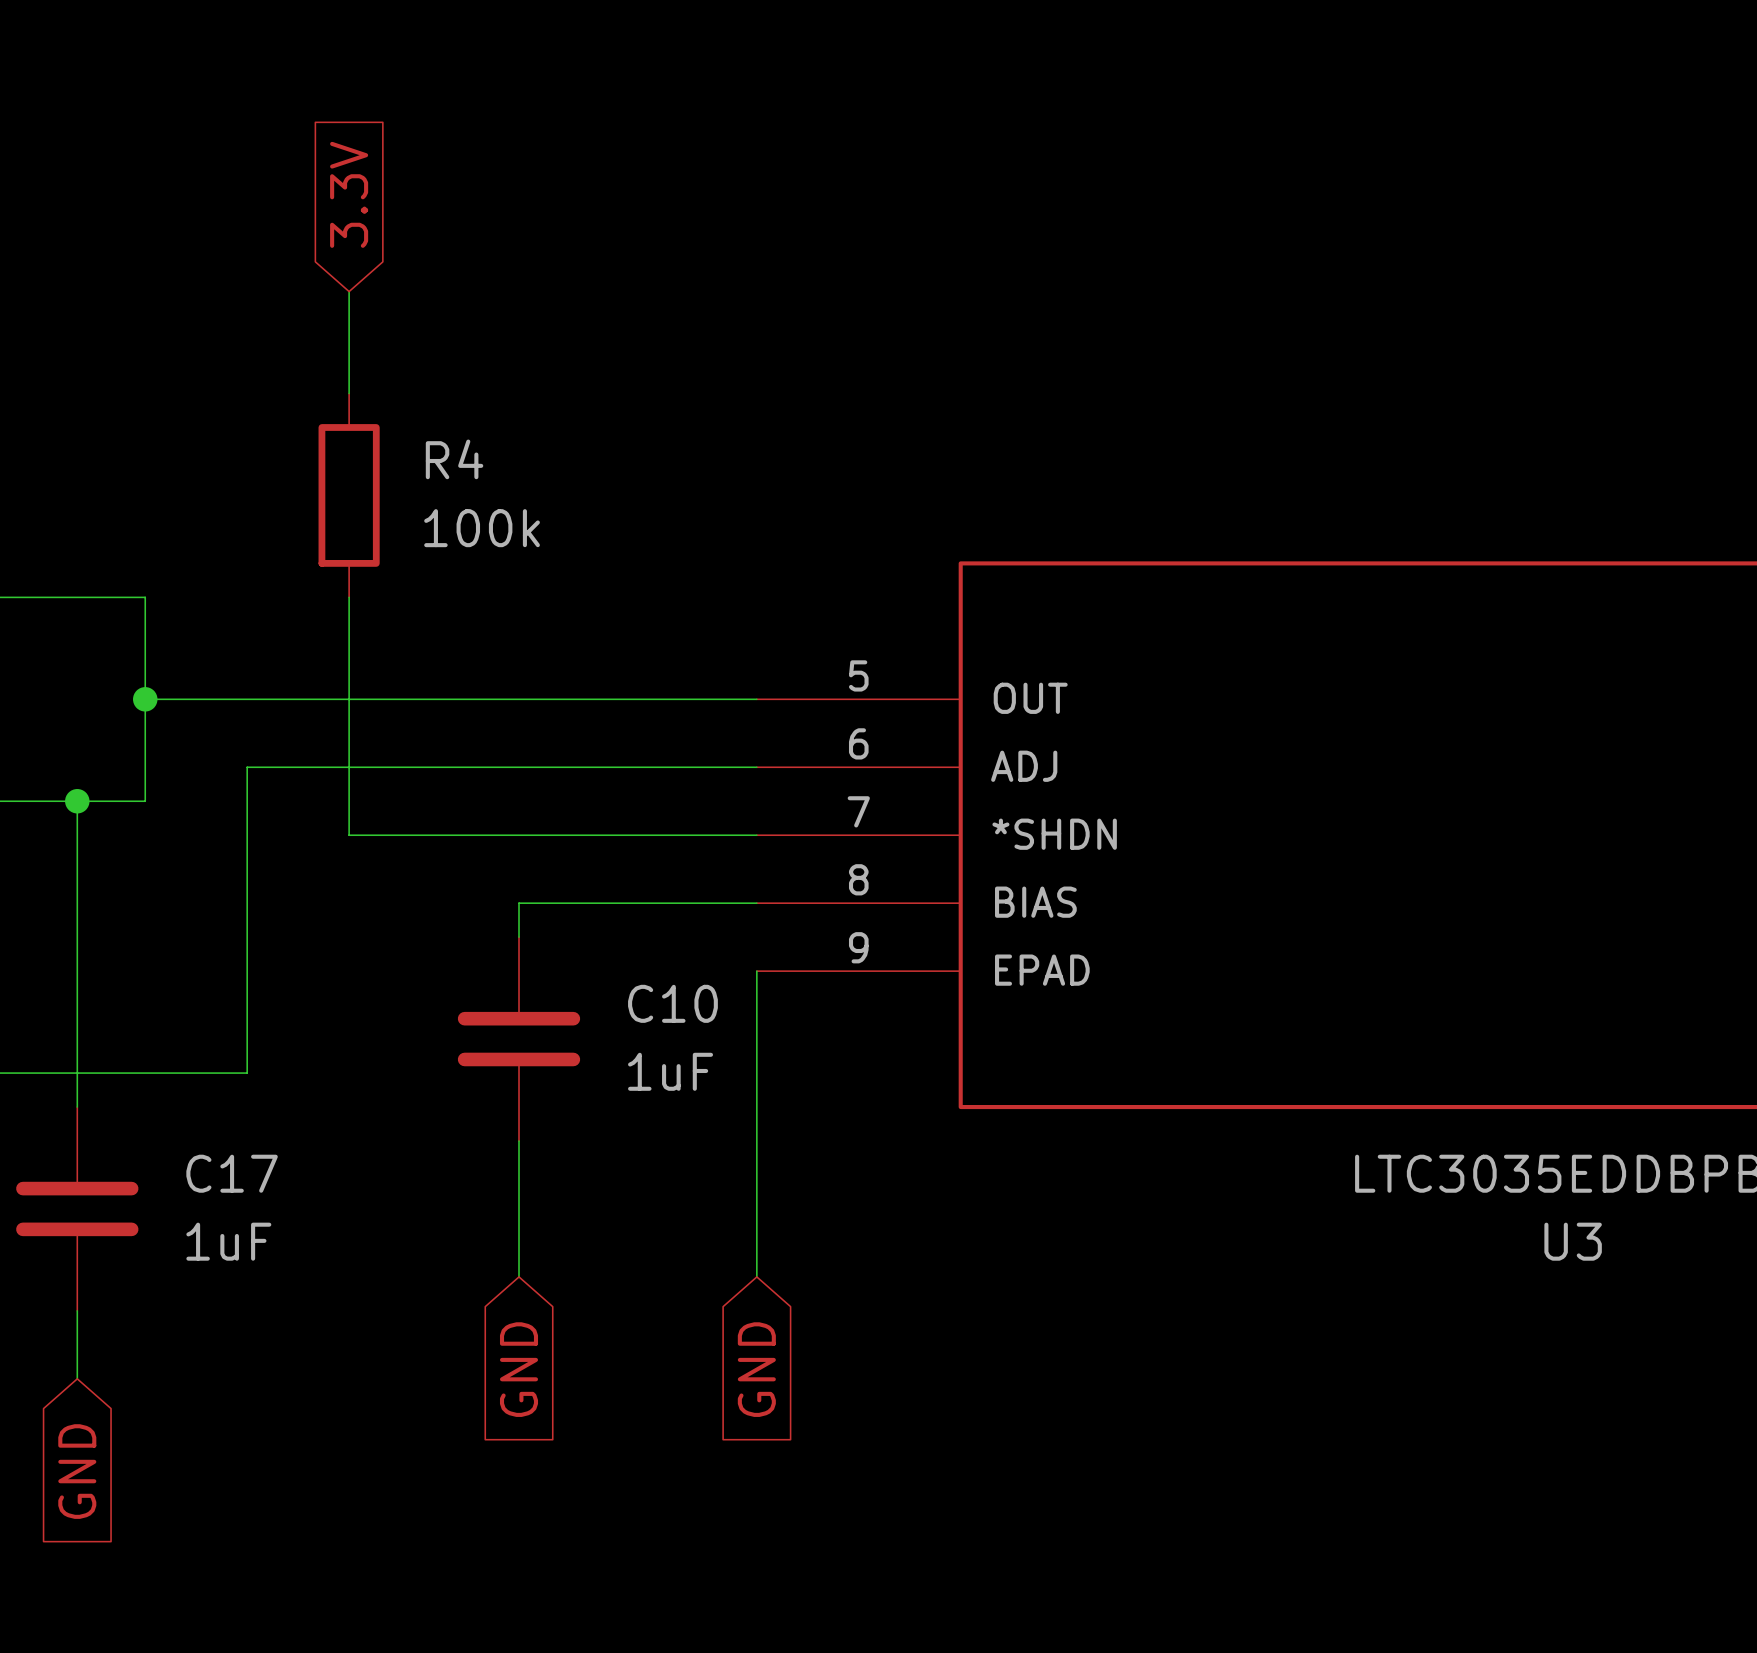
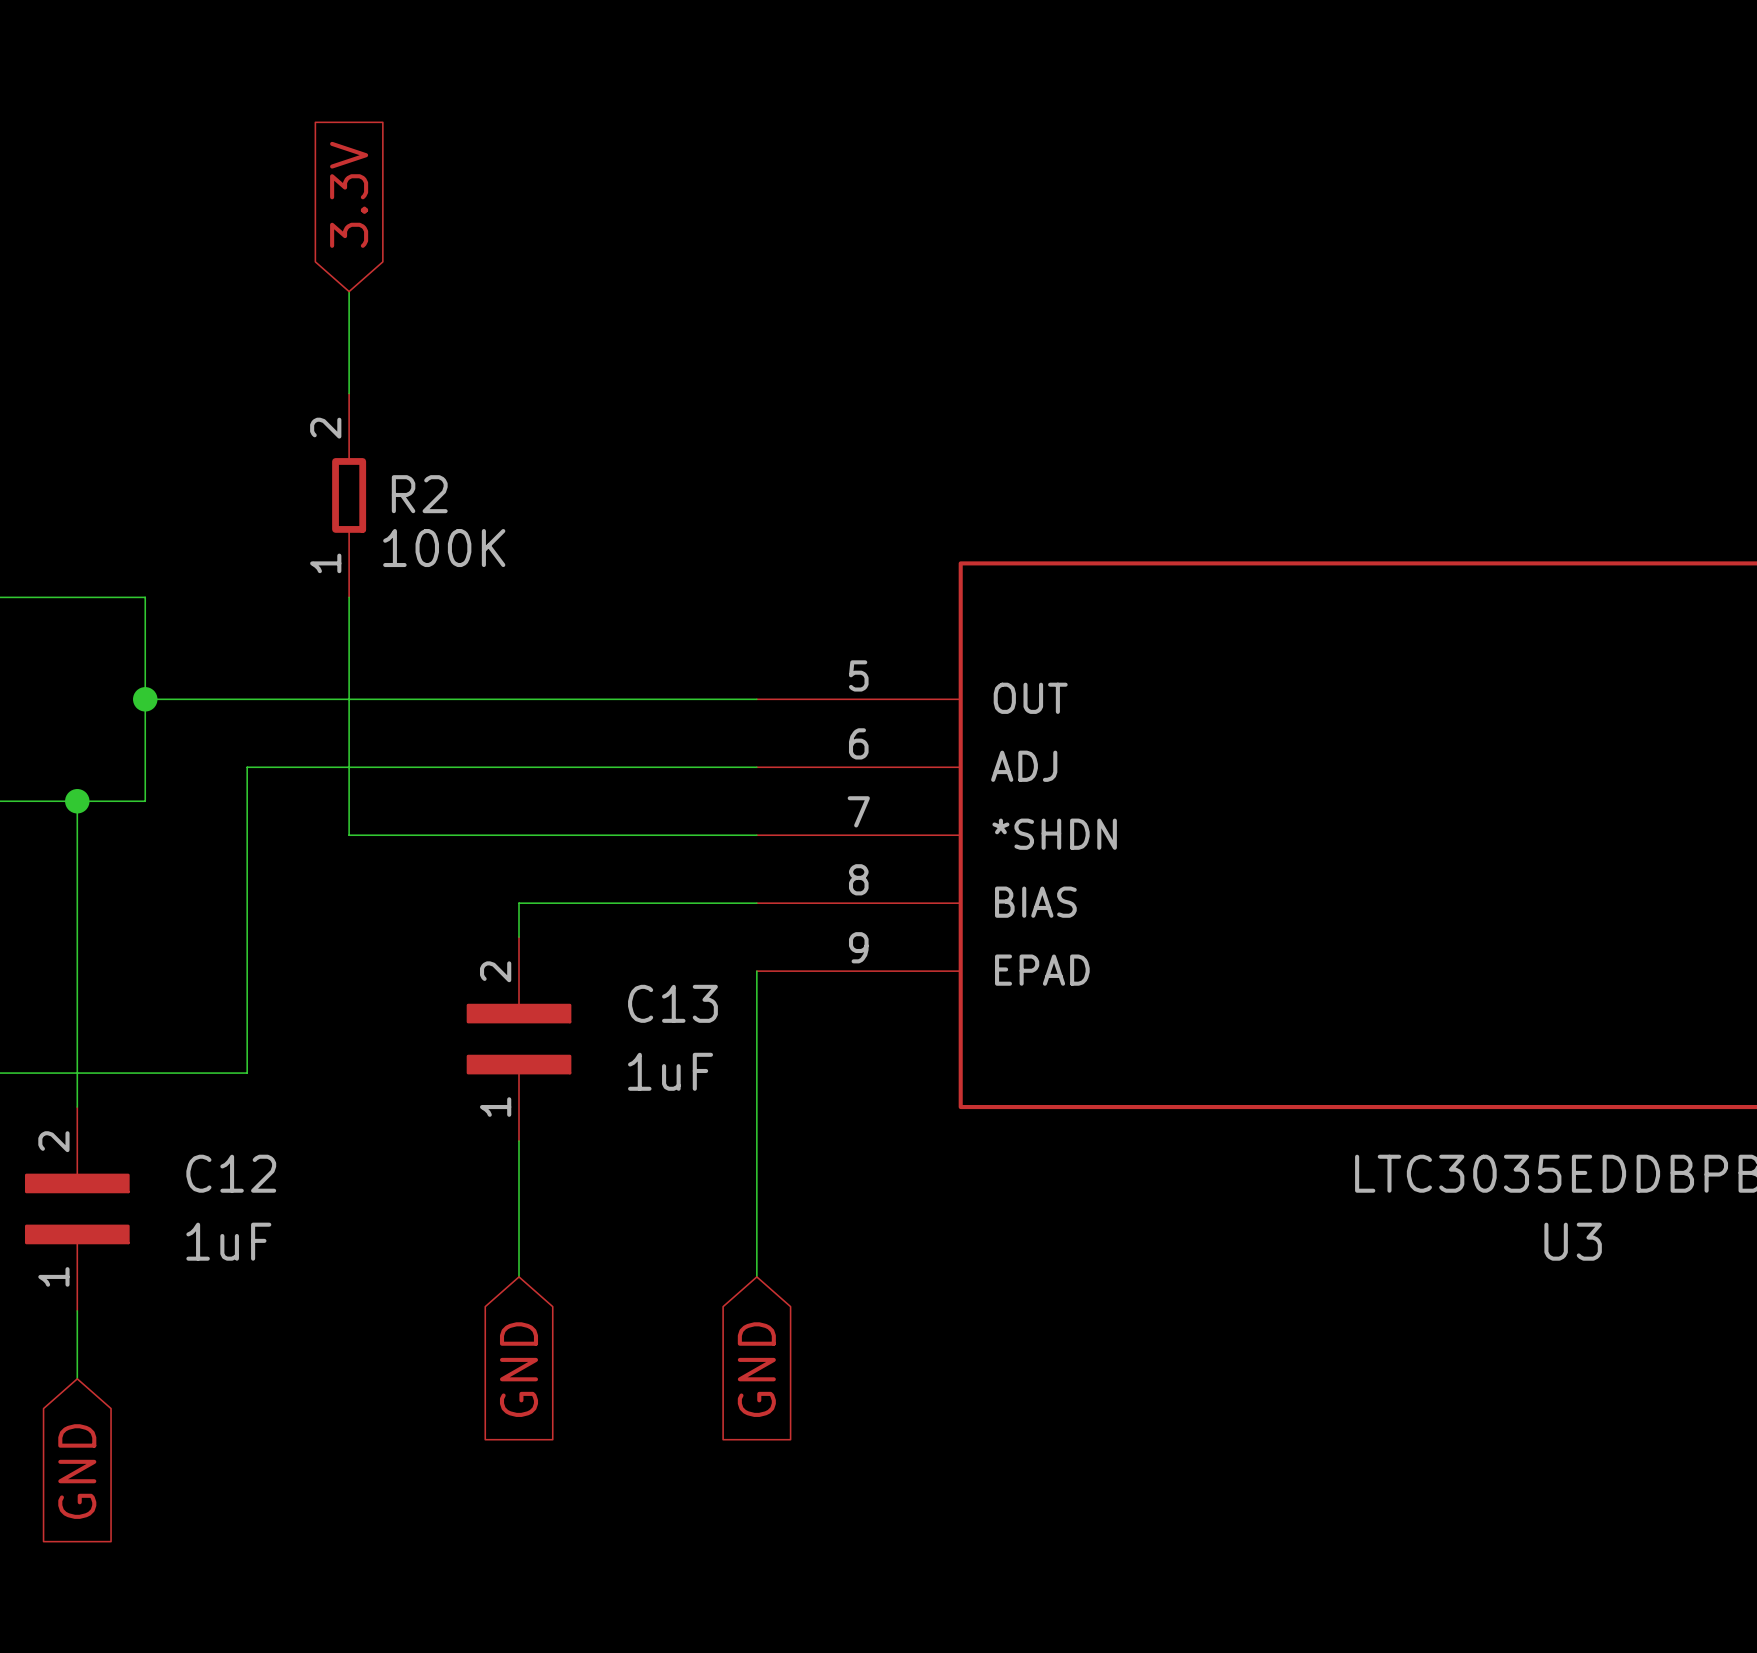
R4: 100k (349, 495) -> none
R2: none -> 100K (349, 495)
C10: 1uF (519, 1039) -> none
C13: none -> 1uF (519, 1039)
C17: 1uF (77, 1208) -> none
C12: none -> 1uF (77, 1208)

